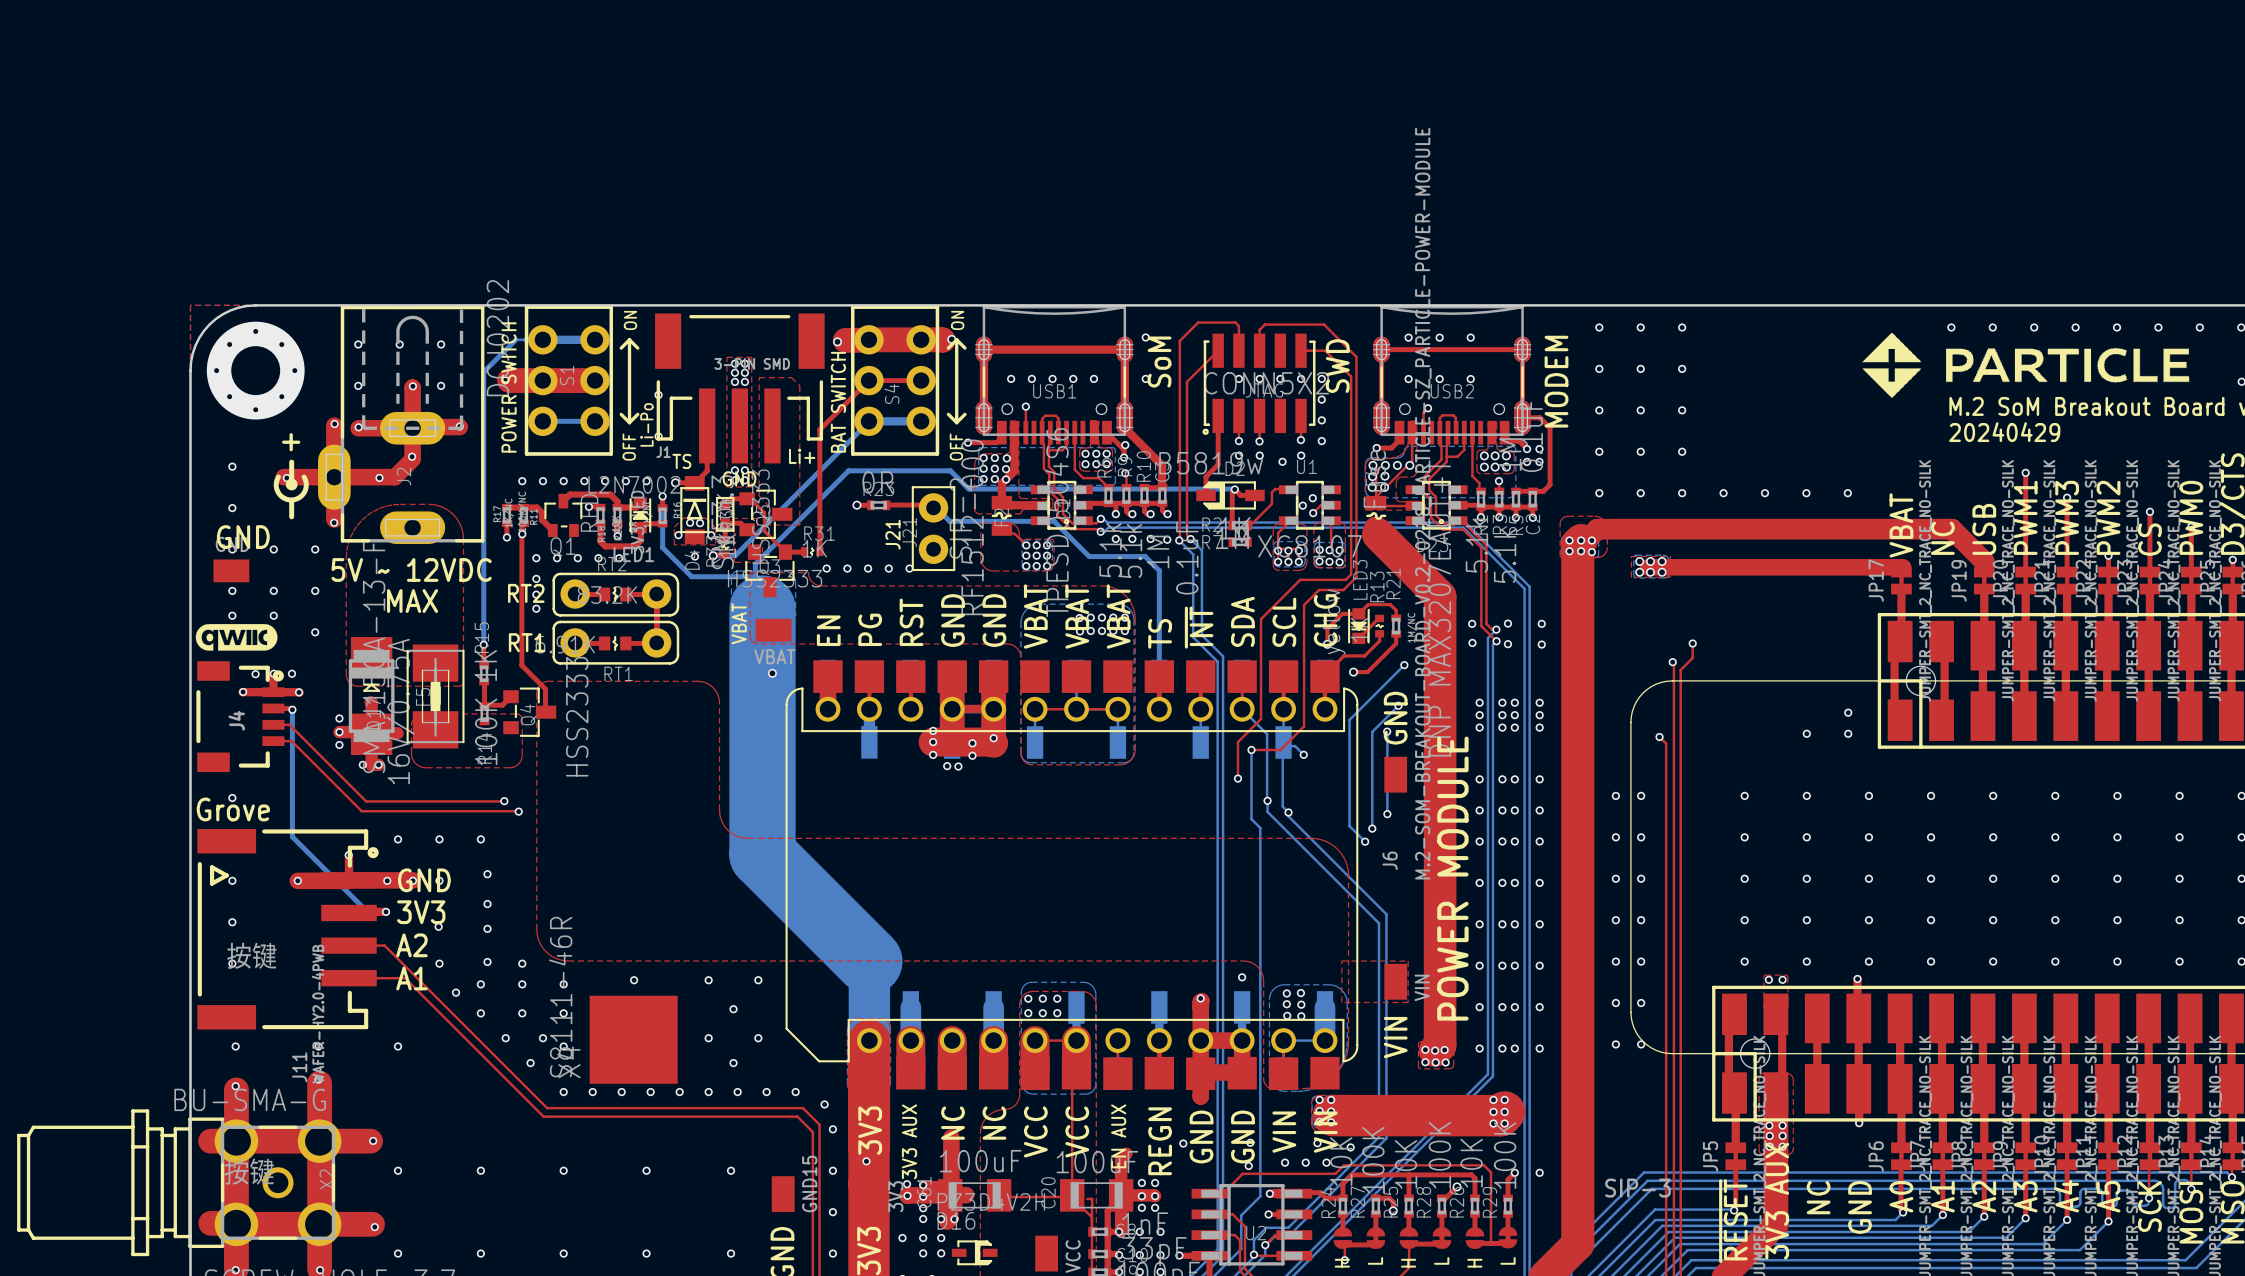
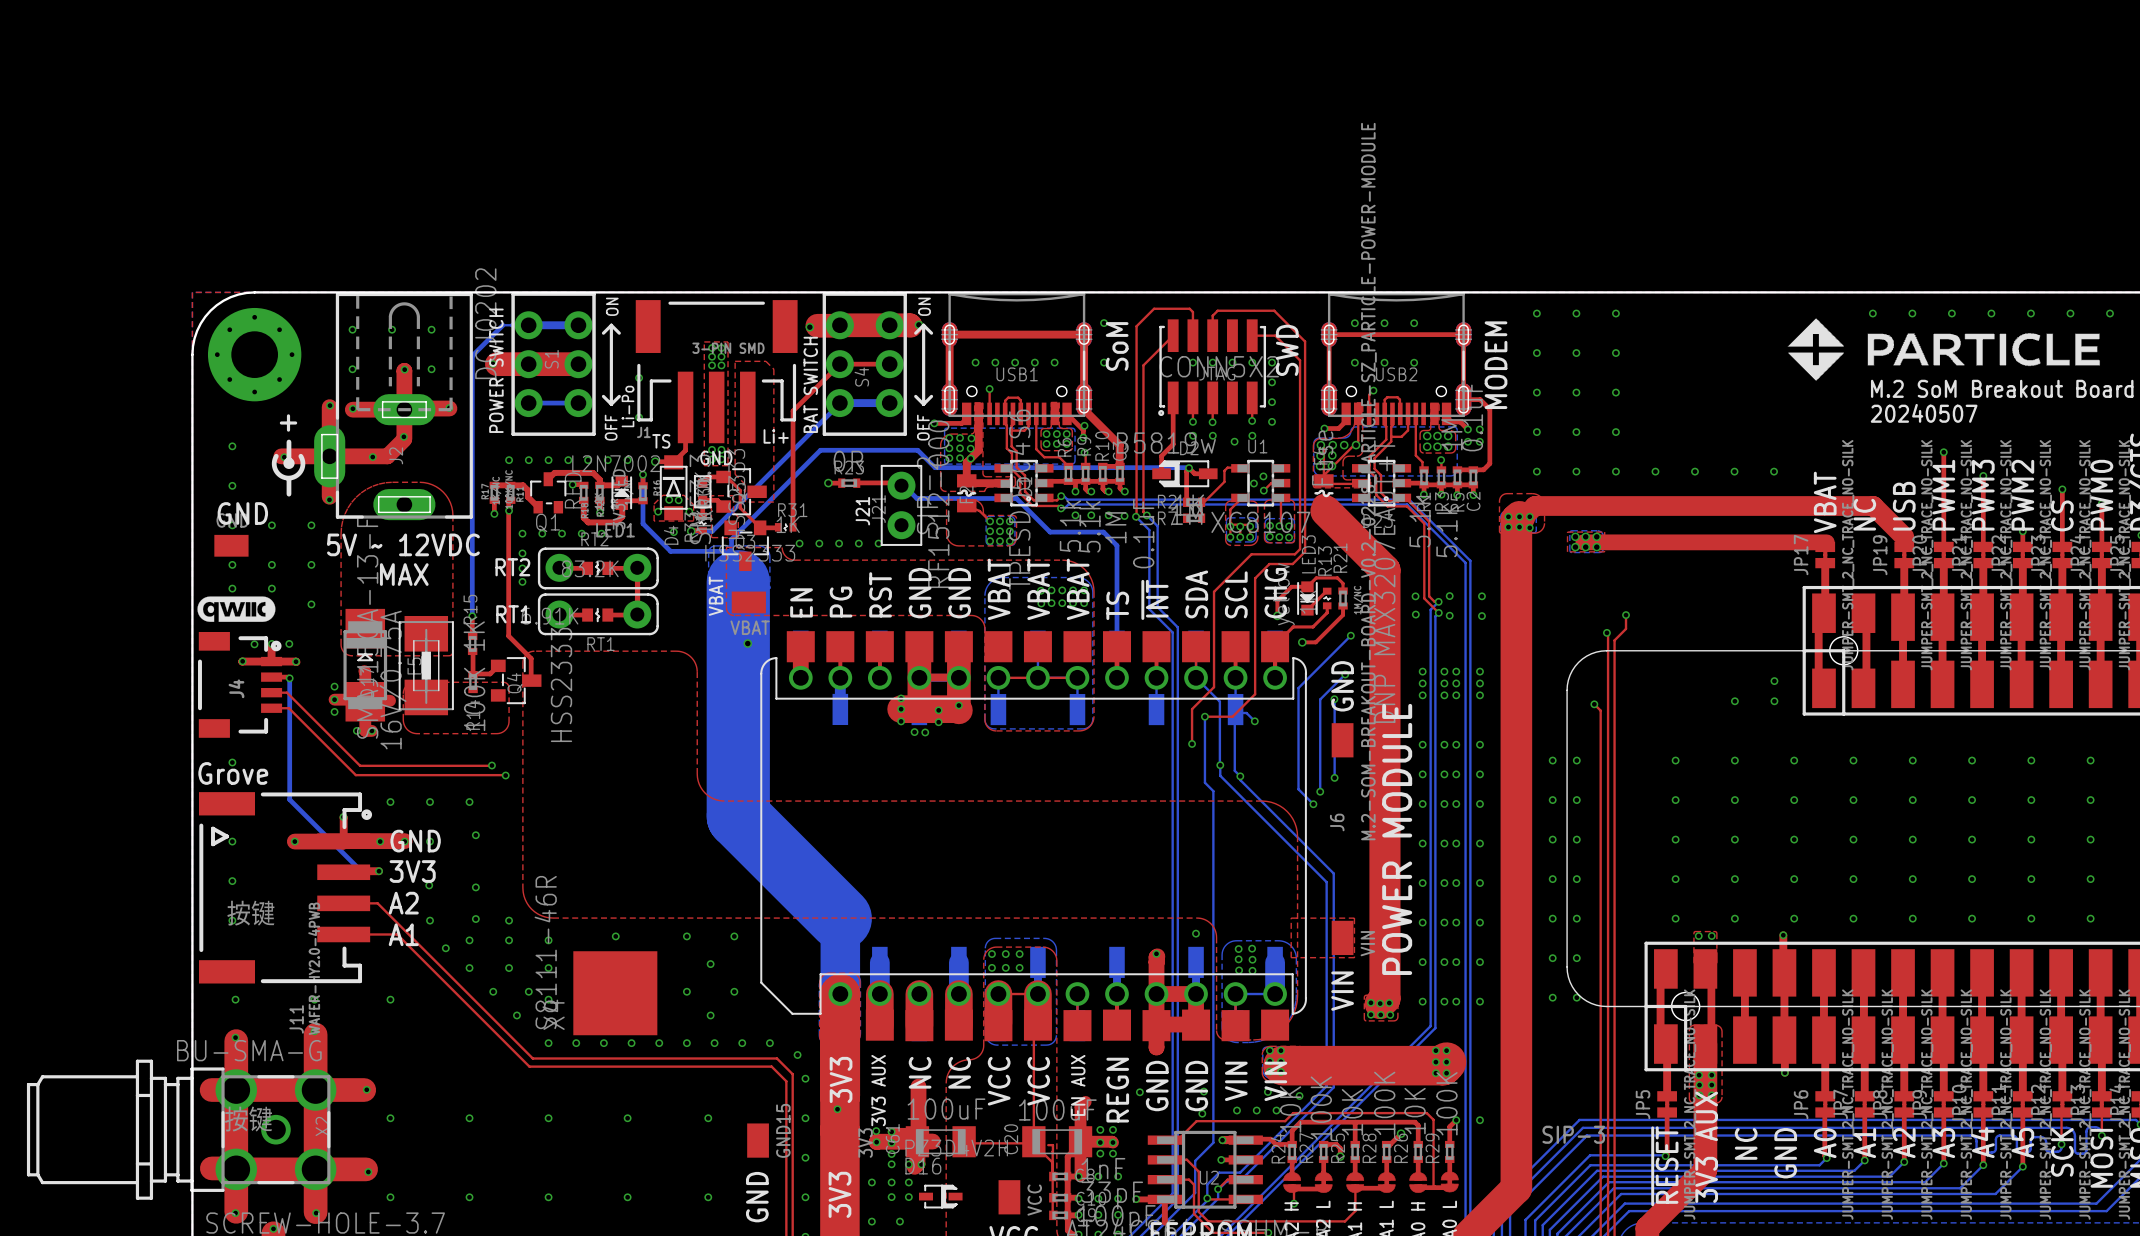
text: 20240429 (2004, 432) -> 20240507 (1924, 413)
via: (487, 904) -> none

